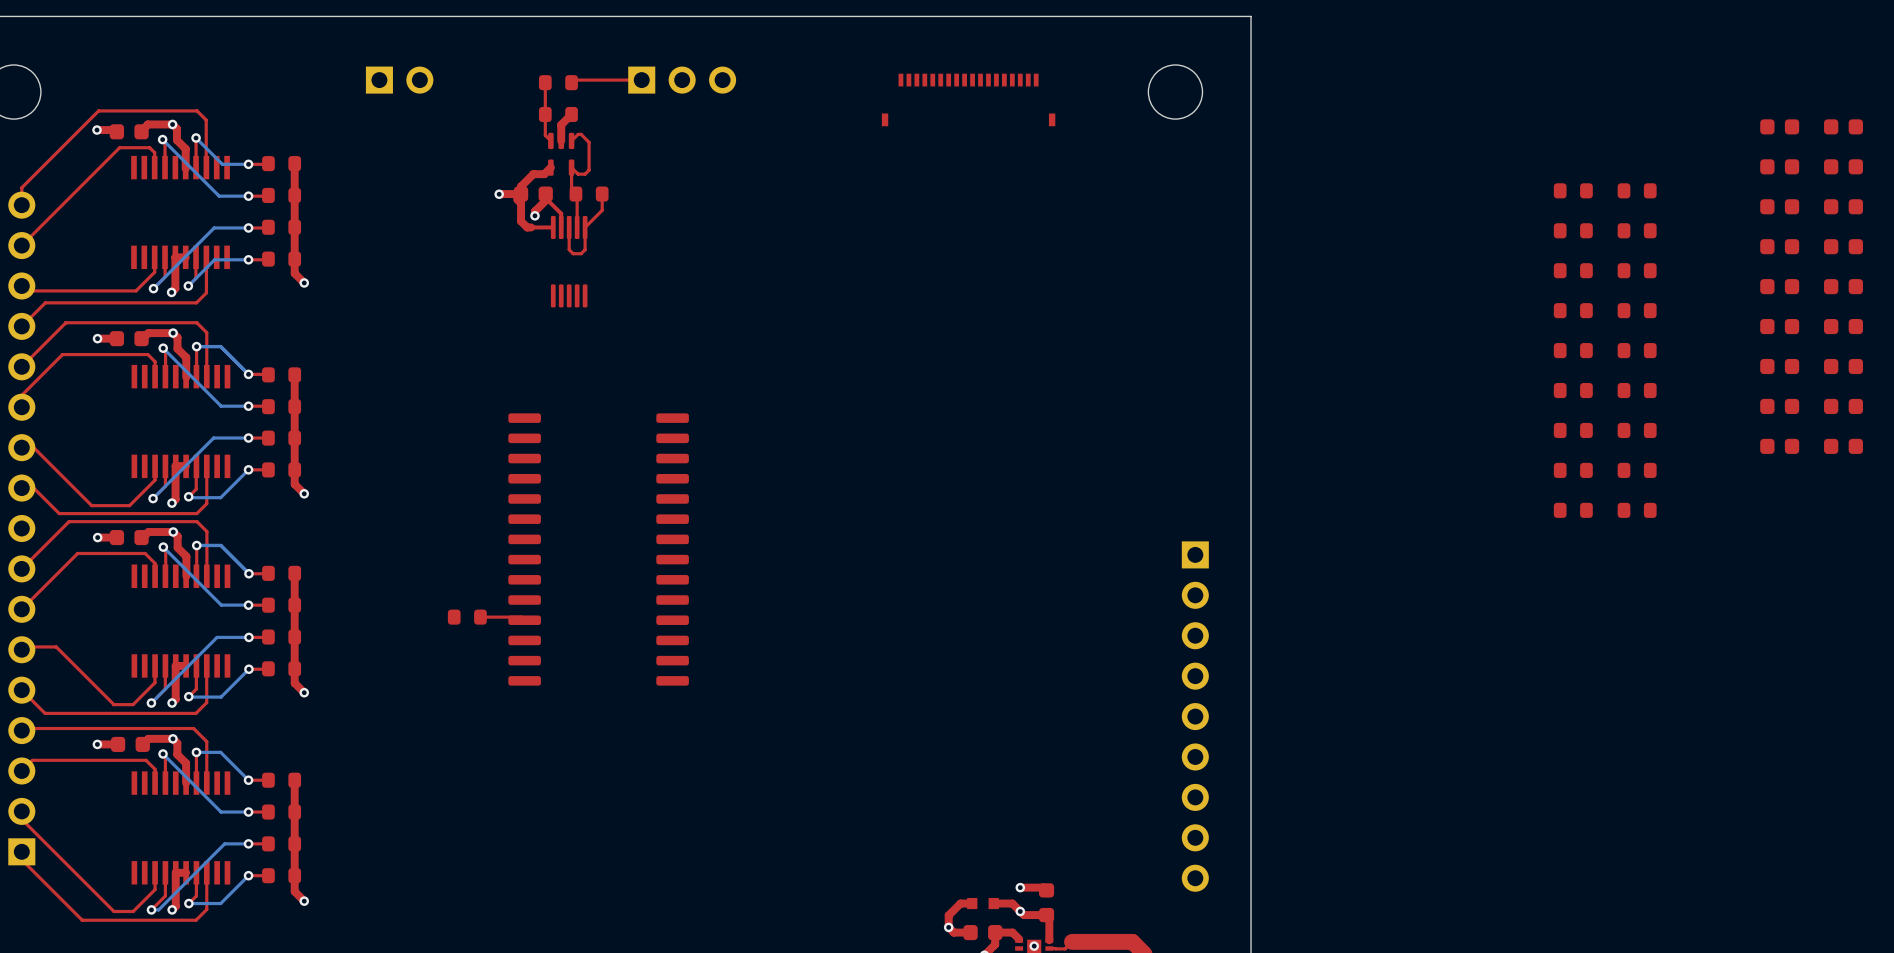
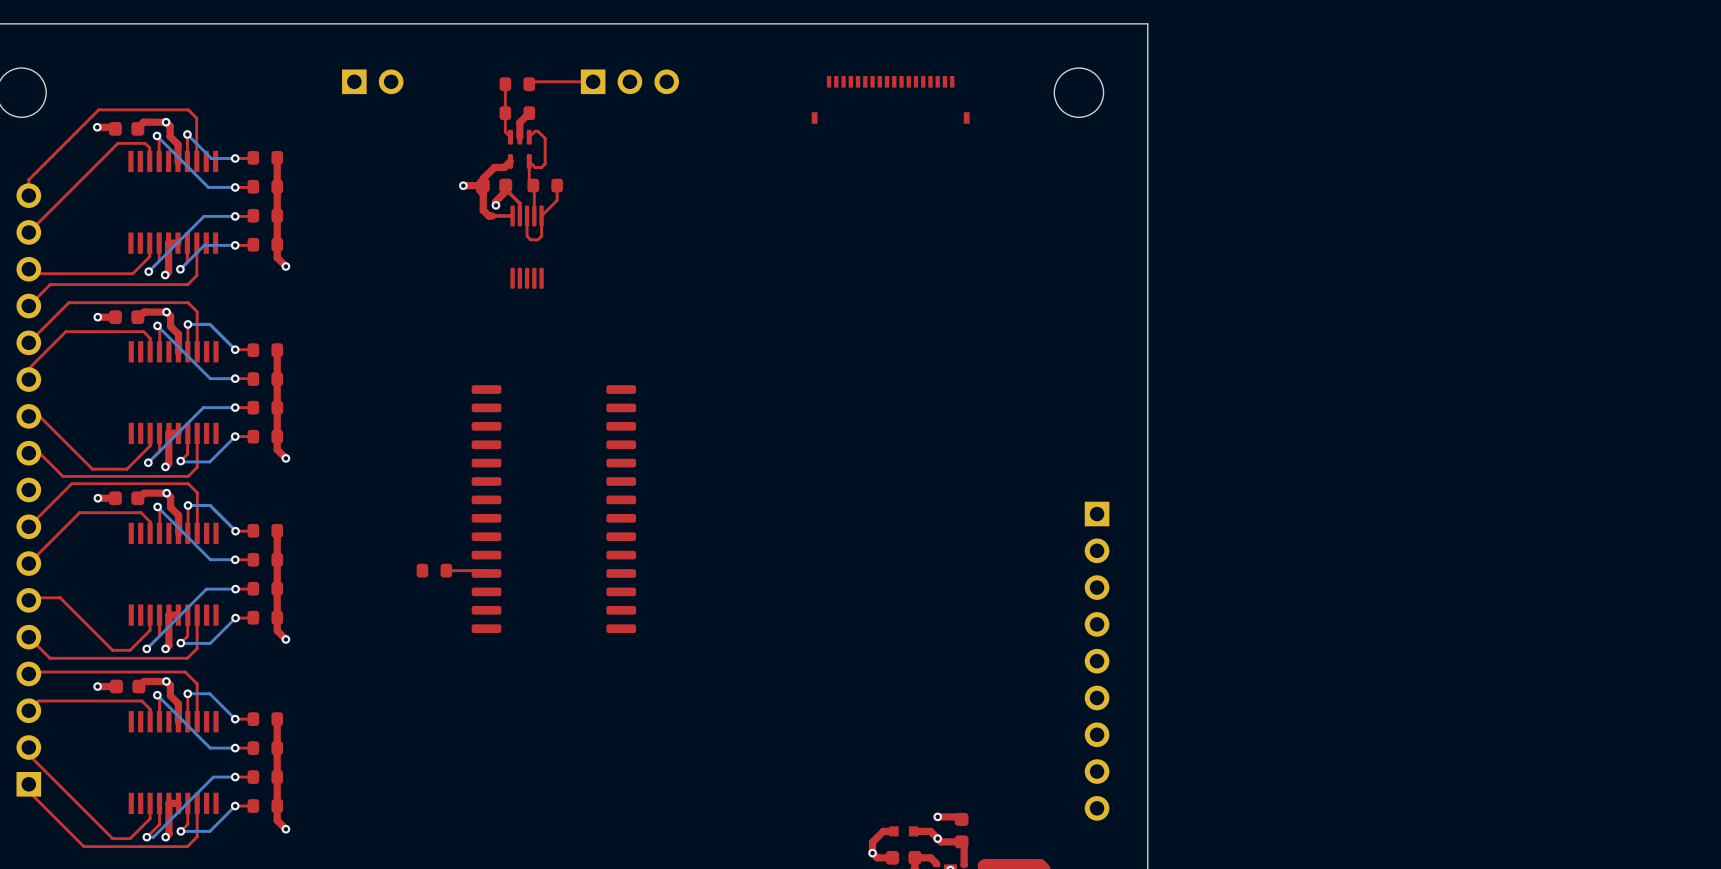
part: (1779, 126) -> none
part: (1843, 126) -> none
part: (1779, 166) -> none
part: (1843, 166) -> none
part: (1573, 190) -> none
part: (1637, 190) -> none
part: (1779, 206) -> none
part: (1843, 206) -> none
part: (1573, 230) -> none
part: (1637, 230) -> none
part: (1779, 246) -> none
part: (1843, 246) -> none
part: (1573, 270) -> none
part: (1637, 270) -> none
part: (1779, 286) -> none
part: (1843, 286) -> none
part: (1573, 310) -> none
part: (1637, 310) -> none
part: (1779, 326) -> none
part: (1843, 326) -> none
part: (1573, 350) -> none
part: (1637, 350) -> none
part: (1779, 366) -> none
part: (1843, 366) -> none
part: (1573, 390) -> none
part: (1637, 390) -> none
part: (1779, 406) -> none
part: (1843, 406) -> none
part: (1573, 430) -> none
part: (1637, 430) -> none
part: (1779, 446) -> none
part: (1843, 446) -> none
part: (1573, 470) -> none
part: (1637, 470) -> none
part: (1573, 510) -> none
part: (1637, 510) -> none

